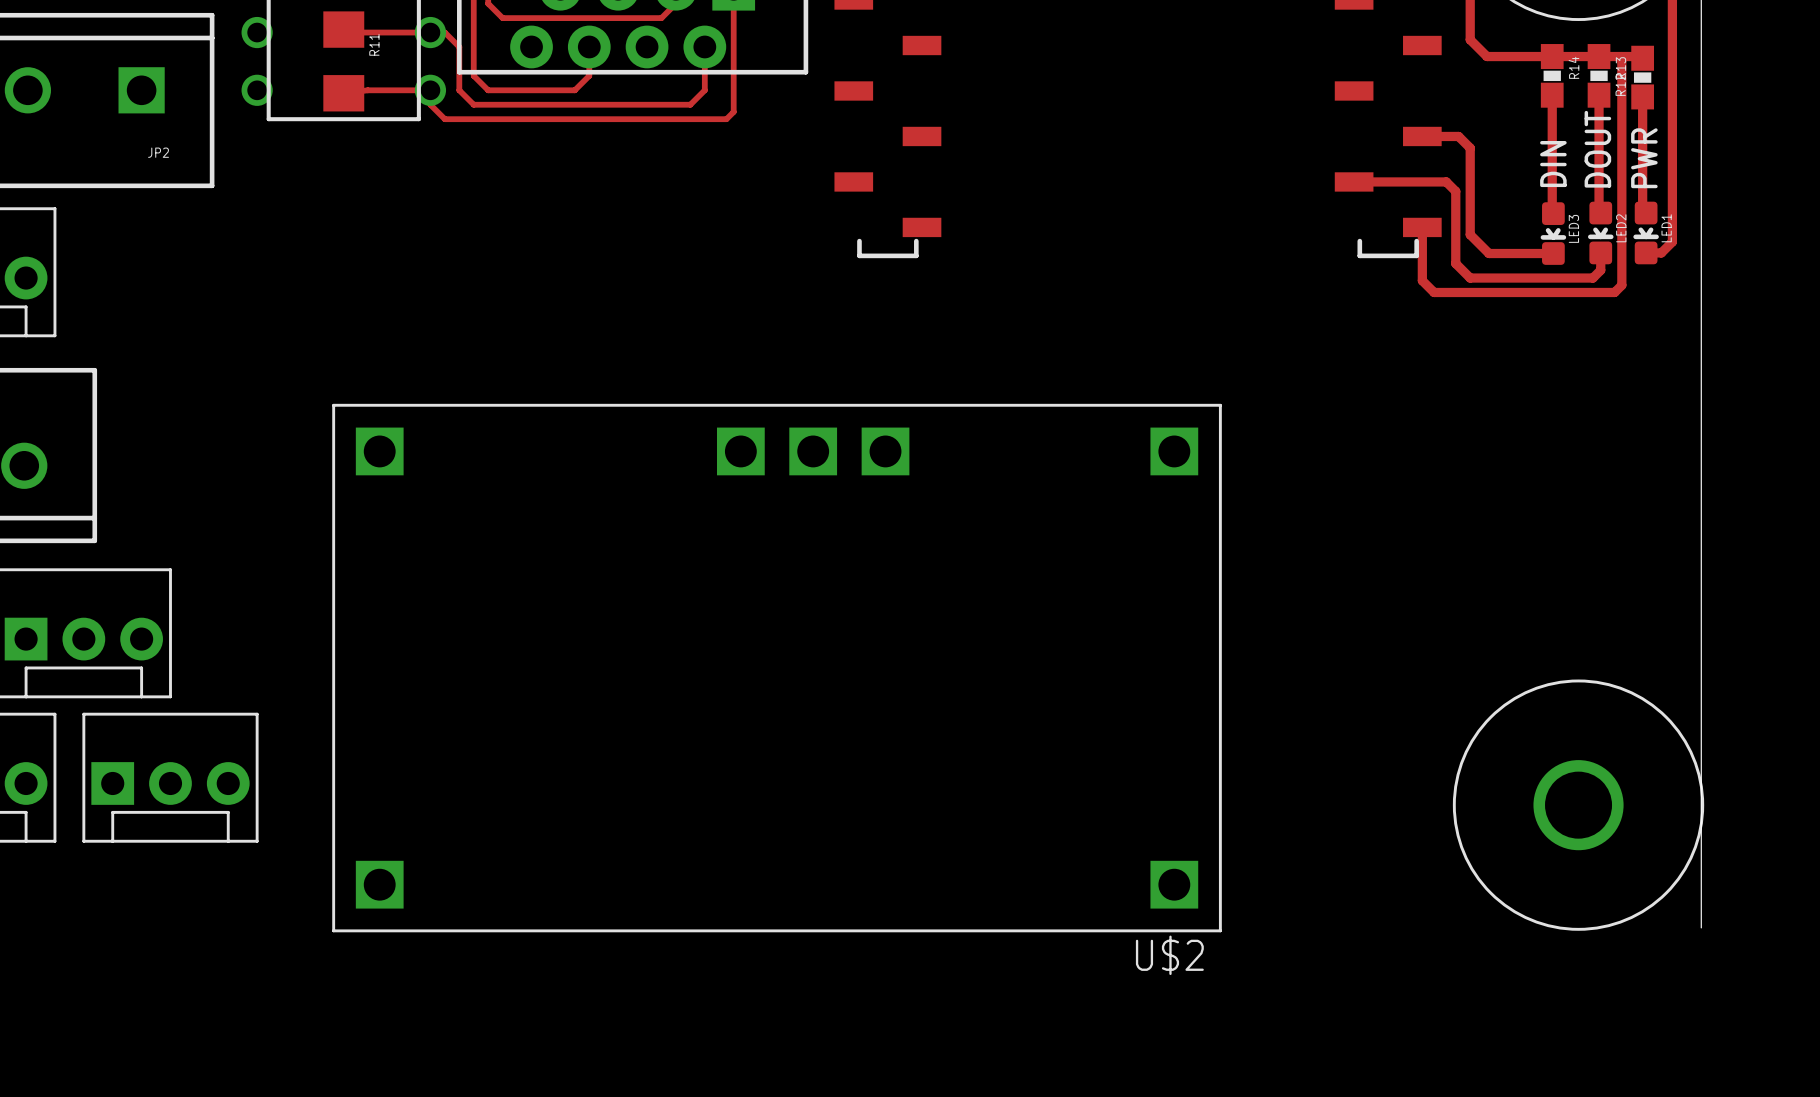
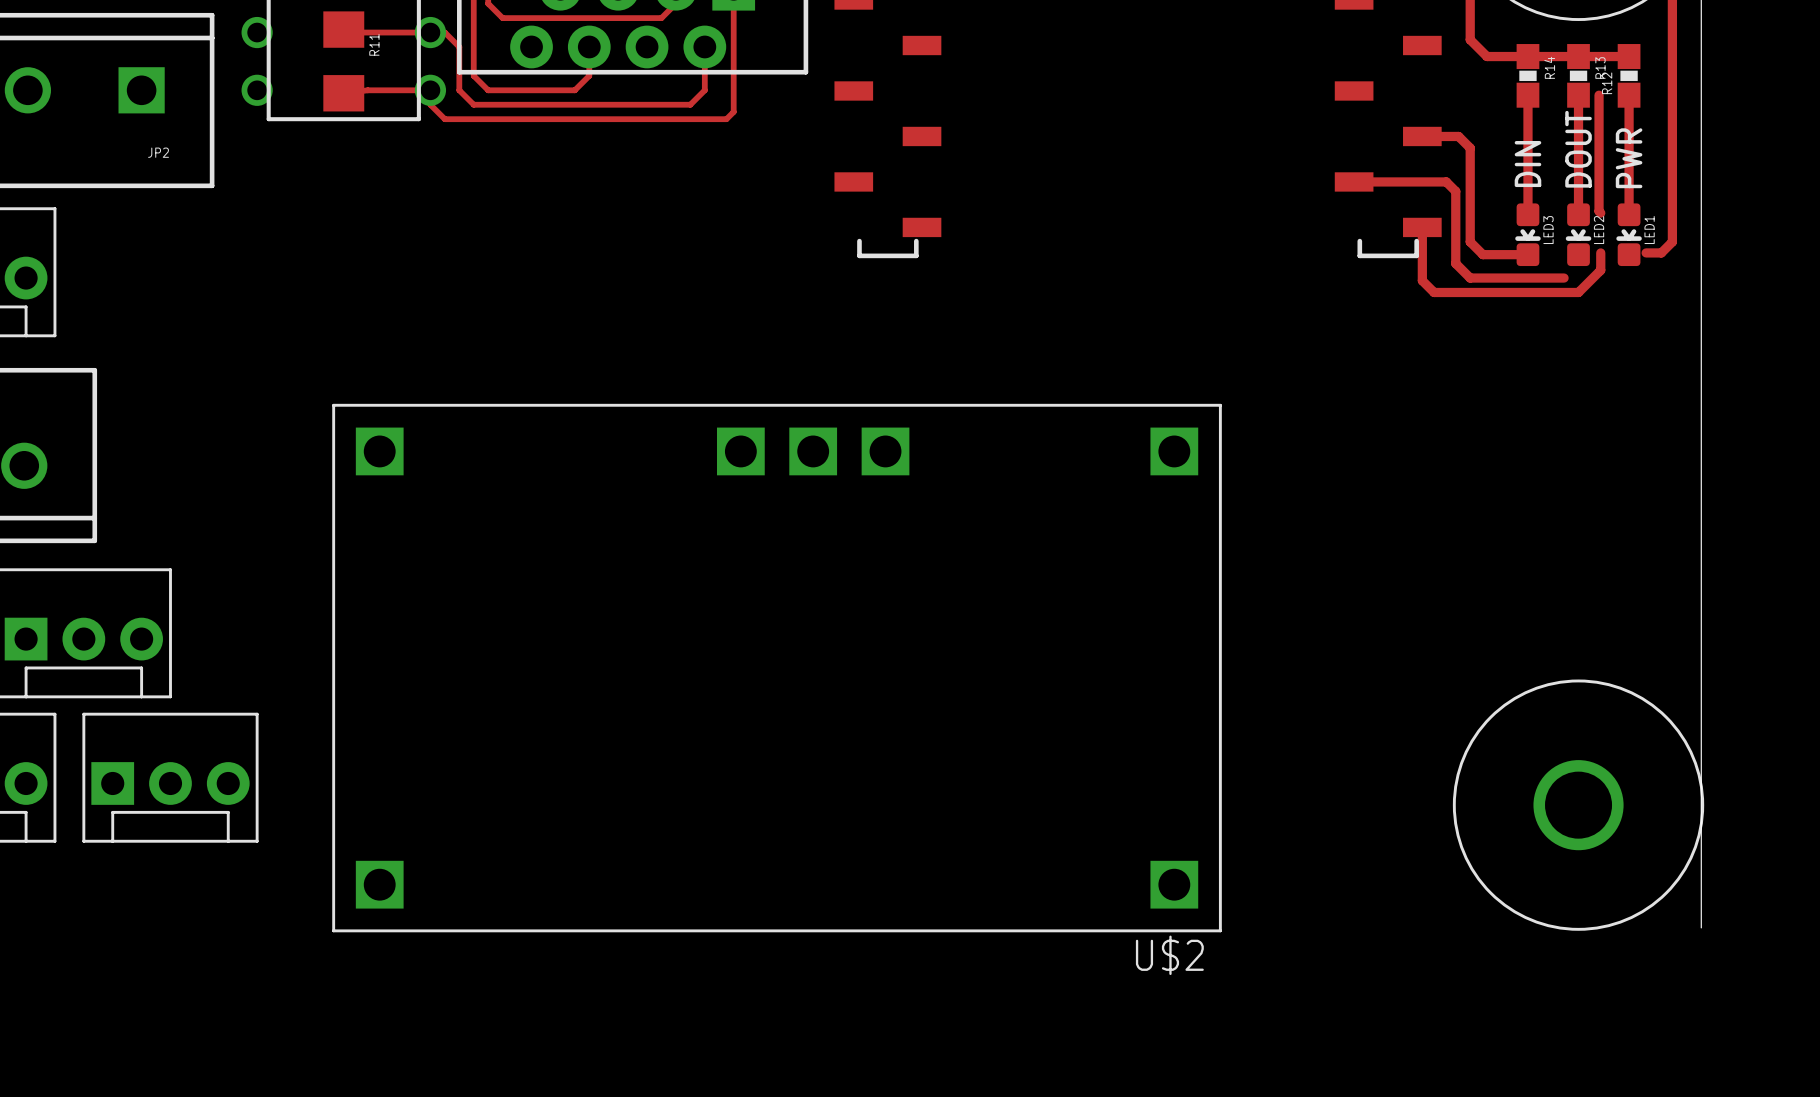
track: (1621, 56) (1621, 285) (1614, 292) (1578, 292) -> none
R14 position: (1552, 75) -> (1527, 75)
R13 position: (1599, 75) -> (1578, 75)
R12 position: (1642, 77) -> (1629, 75)
track: none -> (1527, 95) (1527, 214)
track: (1552, 95) (1553, 213) -> none
track: none -> (1578, 95) (1578, 214)
track: none -> (1629, 95) (1629, 214) (1628, 209)
track: (1642, 96) (1642, 209) (1646, 213) -> none
text position: DOUT (1597, 149) -> DOUT (1578, 149)
text position: PWR (1644, 158) -> PWR (1629, 158)
text position: DIN (1553, 164) -> DIN (1527, 164)
LED2 position: (1600, 232) -> (1578, 234)
LED1 position: (1646, 232) -> (1629, 234)
LED3 position: (1553, 233) -> (1527, 234)
track: (1470, 234) (1489, 253) (1553, 253) -> (1470, 234) (1470, 241) (1482, 254) (1527, 254)
track: (1564, 278) (1592, 278) -> (1578, 292) (1592, 278)

